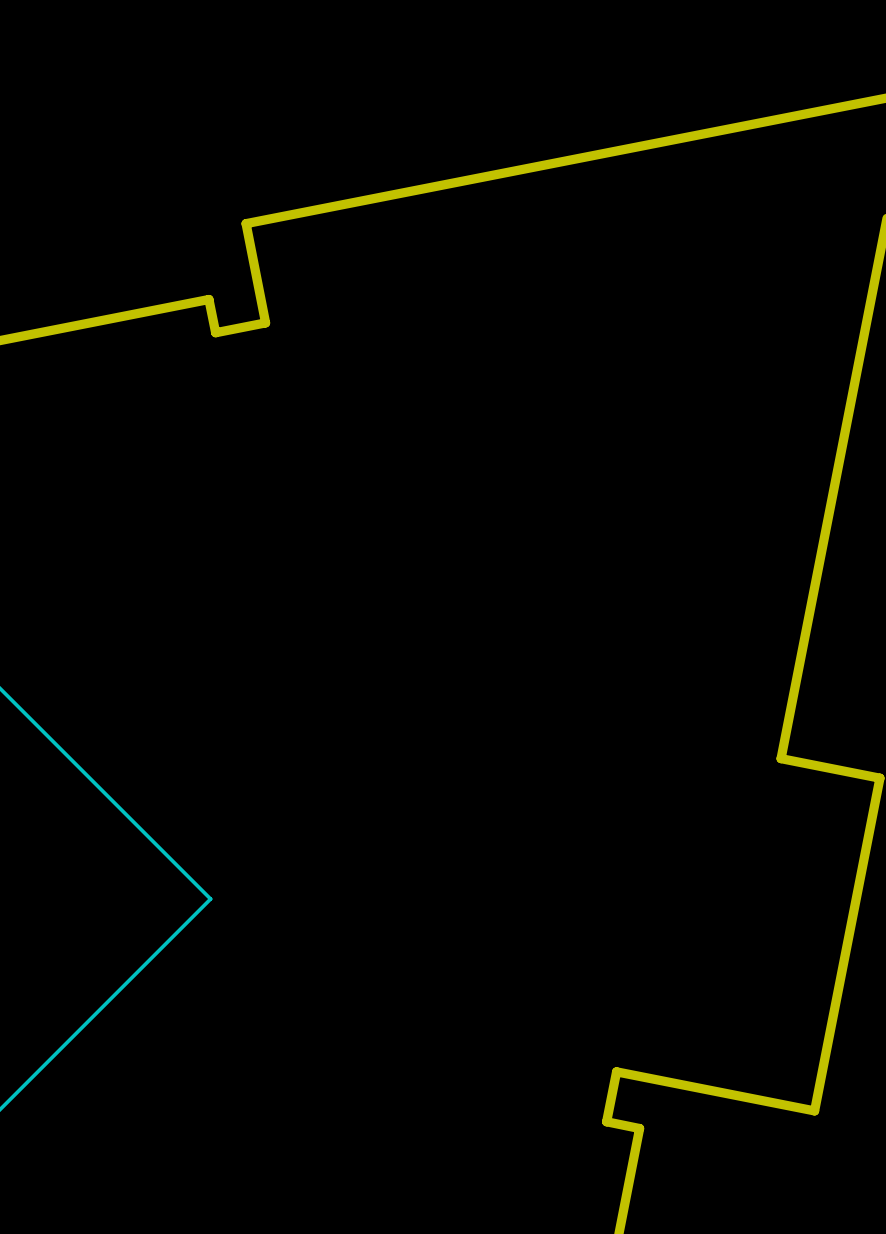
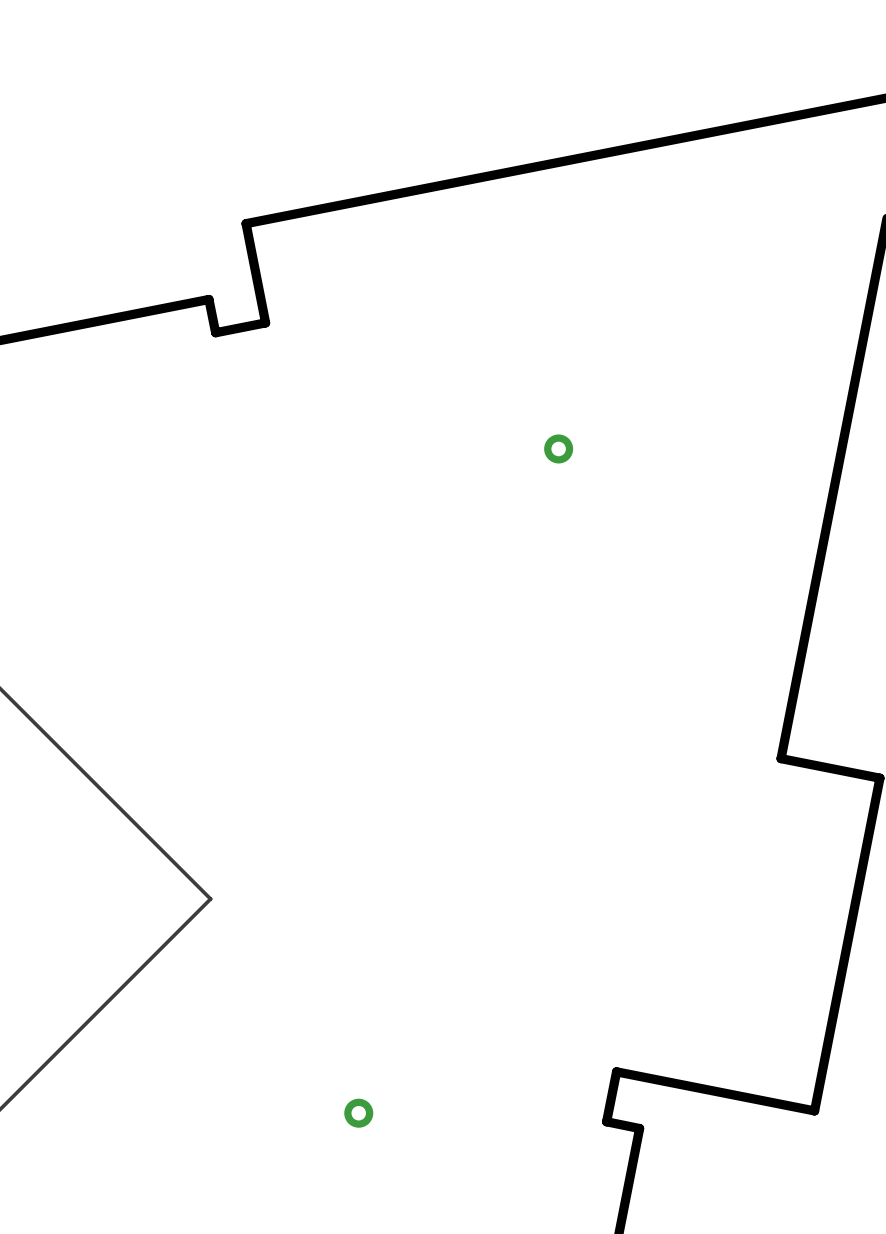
via: none -> (558, 448)
via: none -> (358, 1113)

